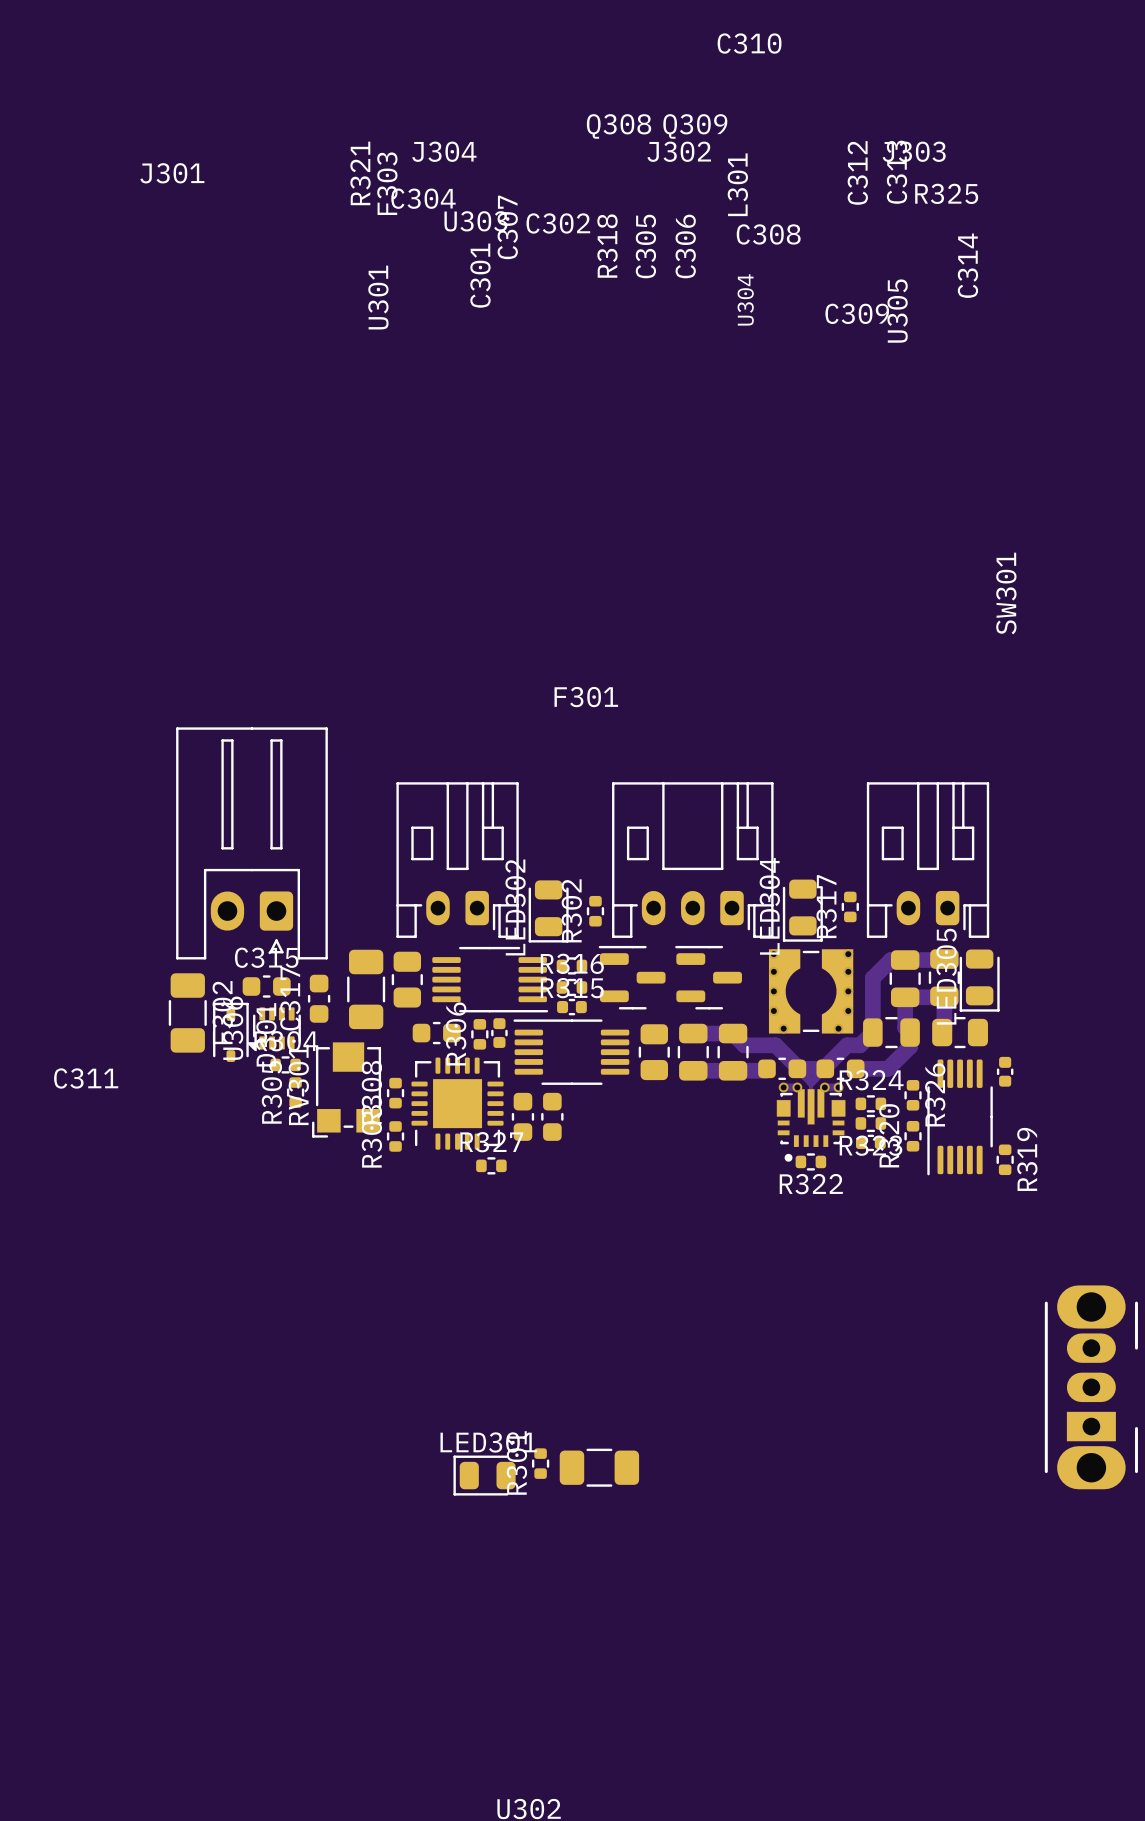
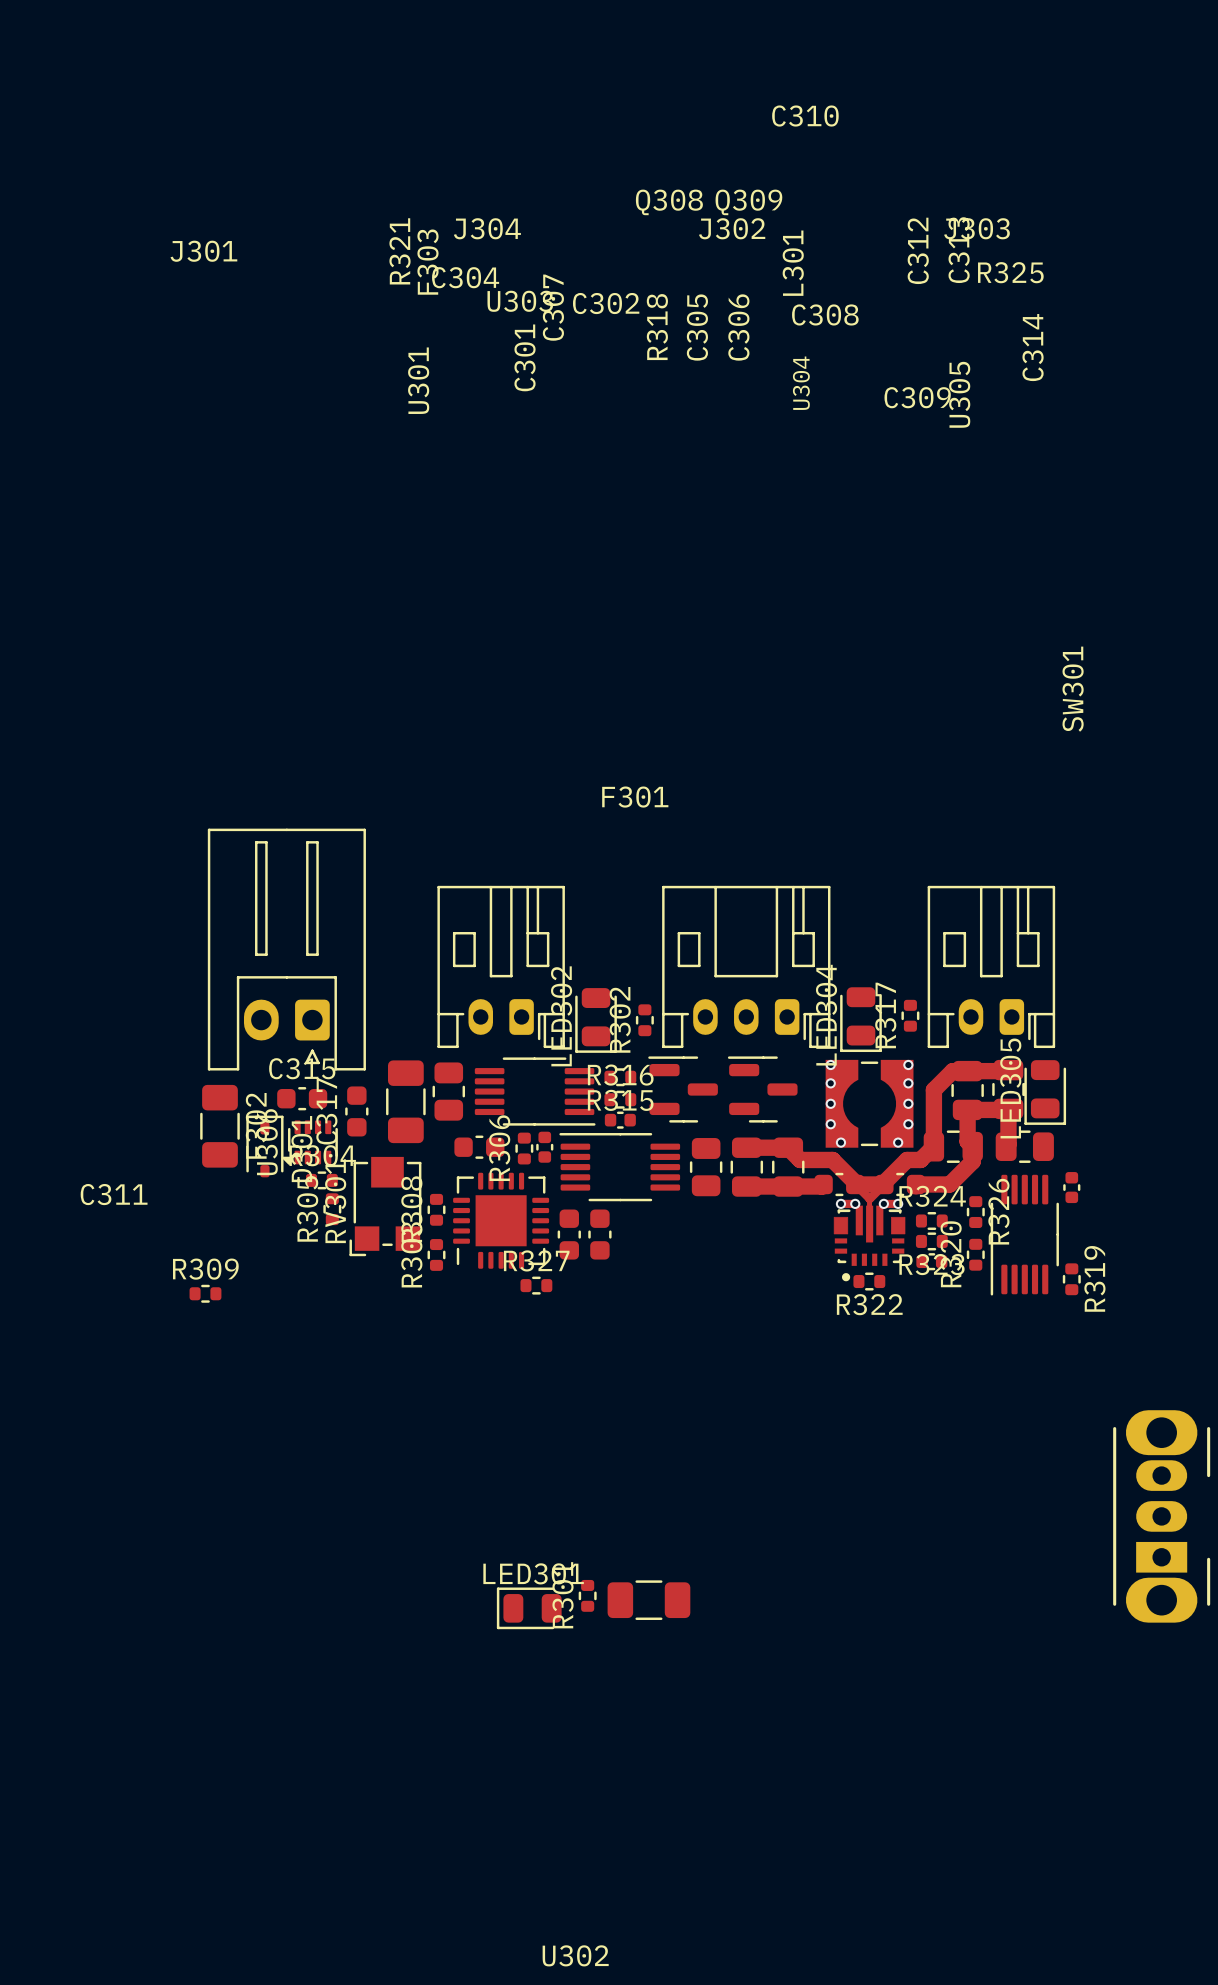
R309: none -> (205, 1293)

